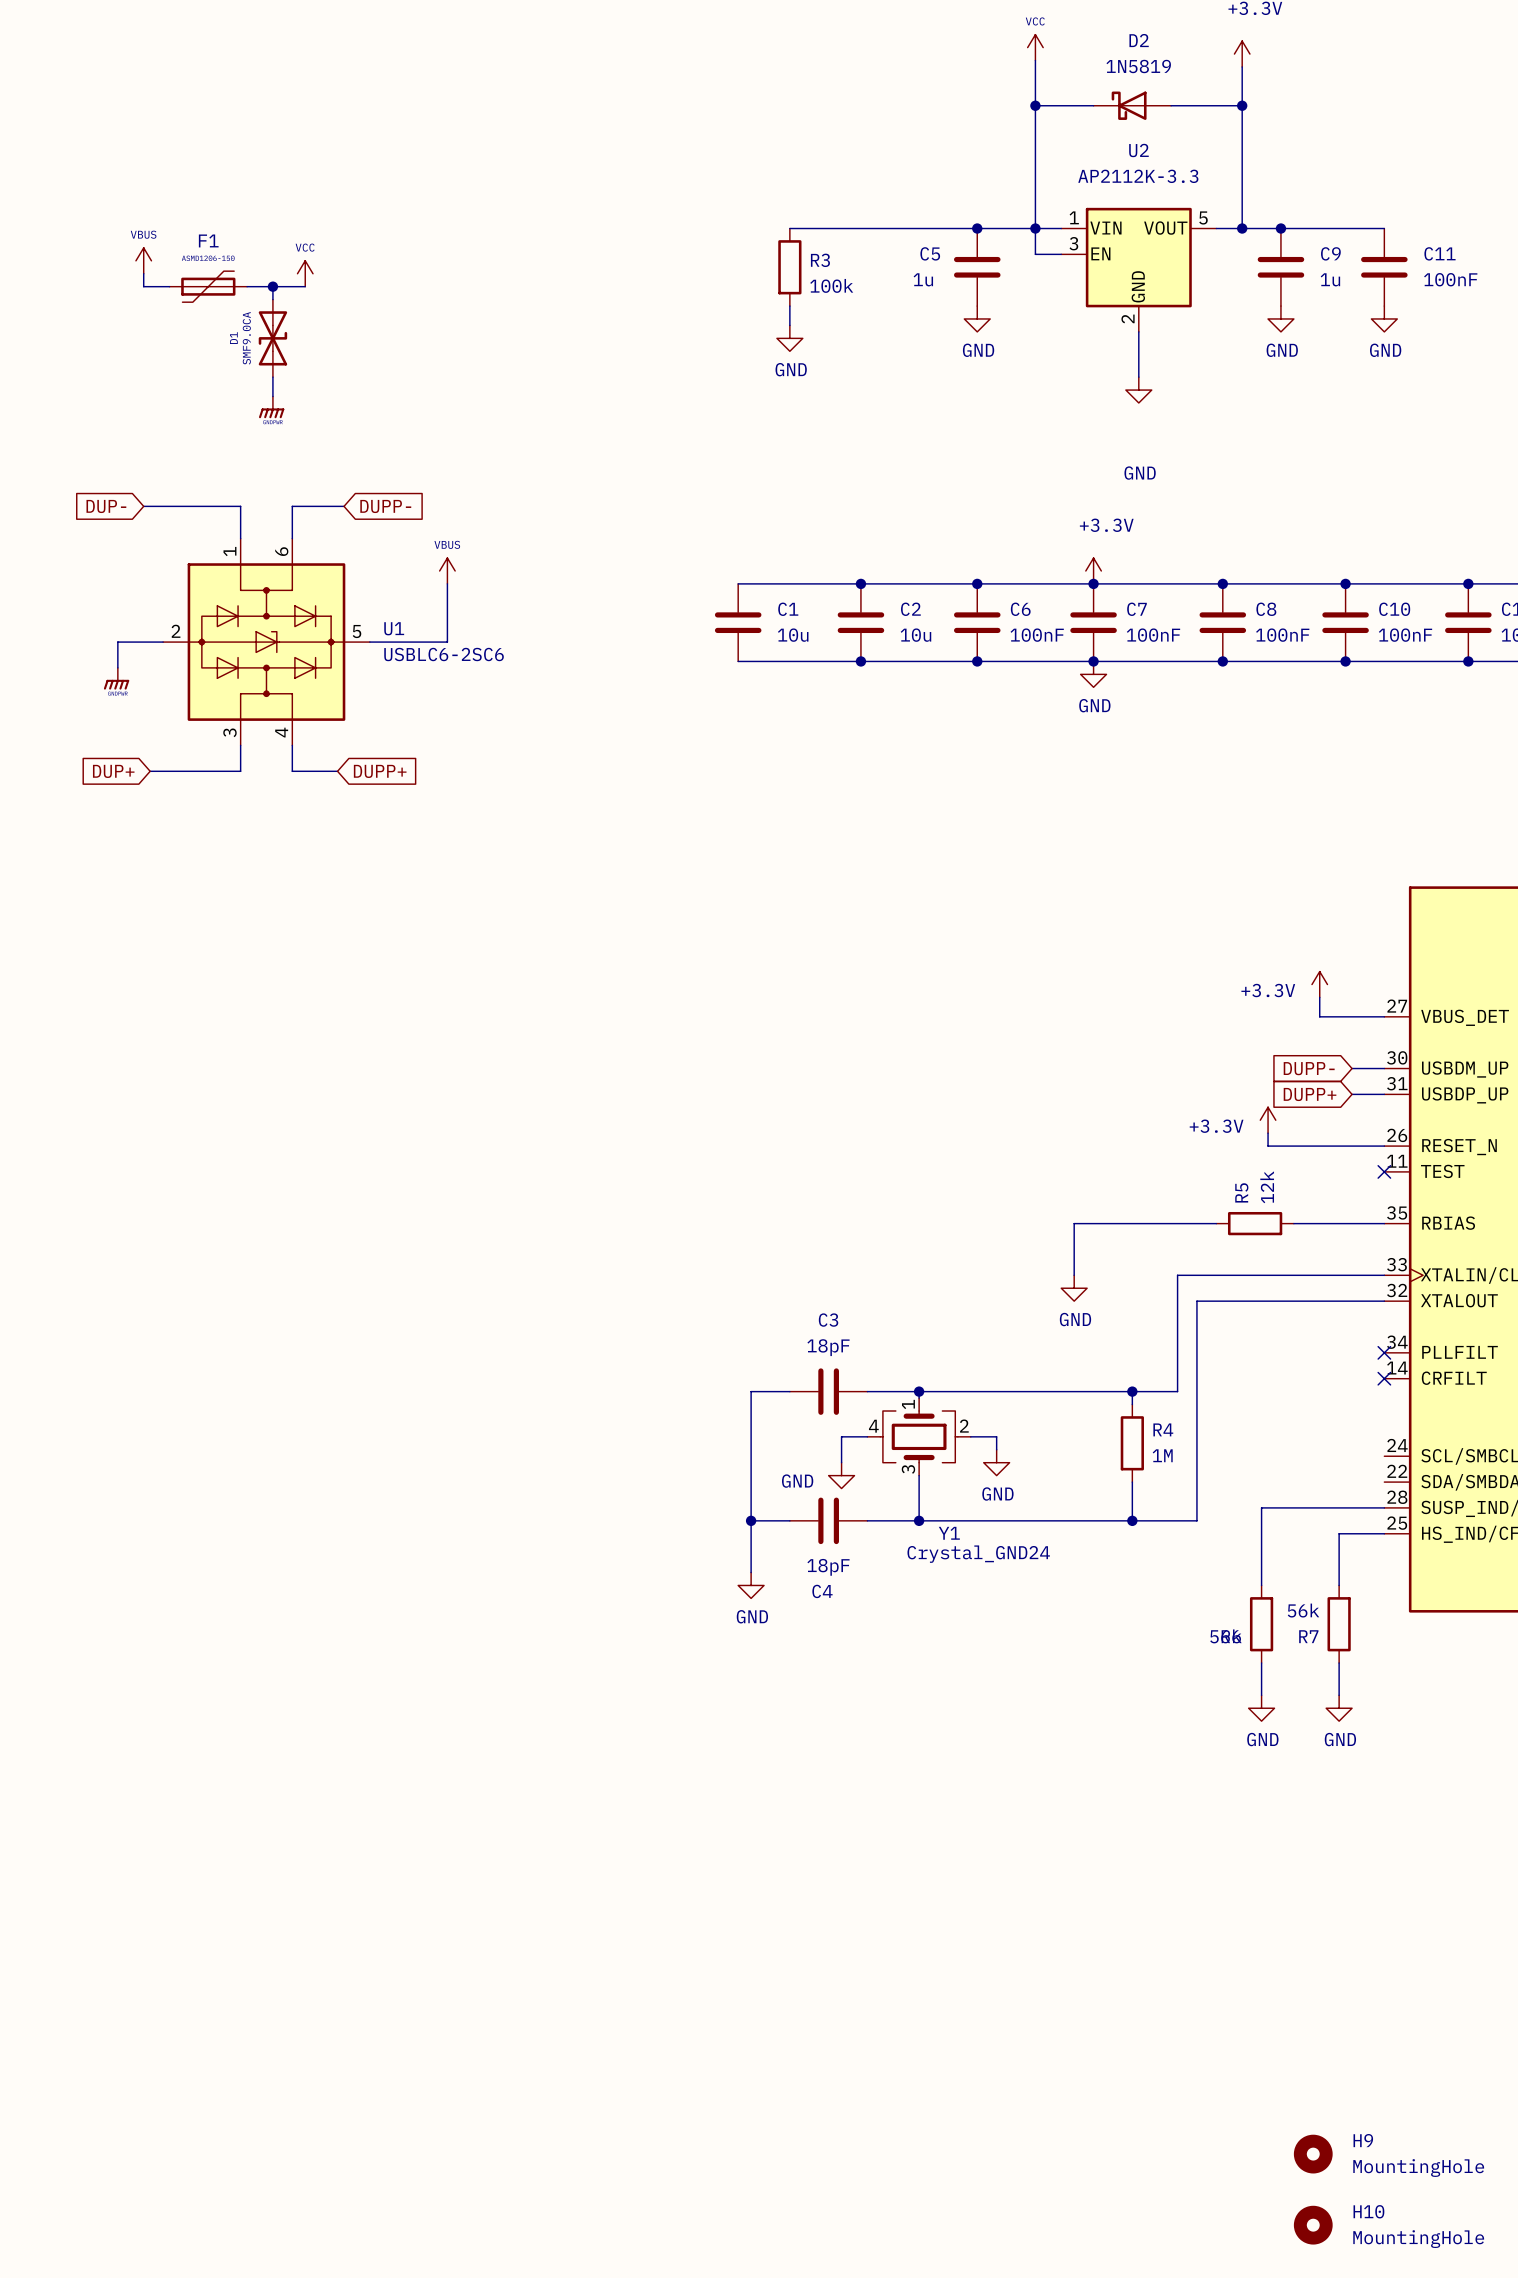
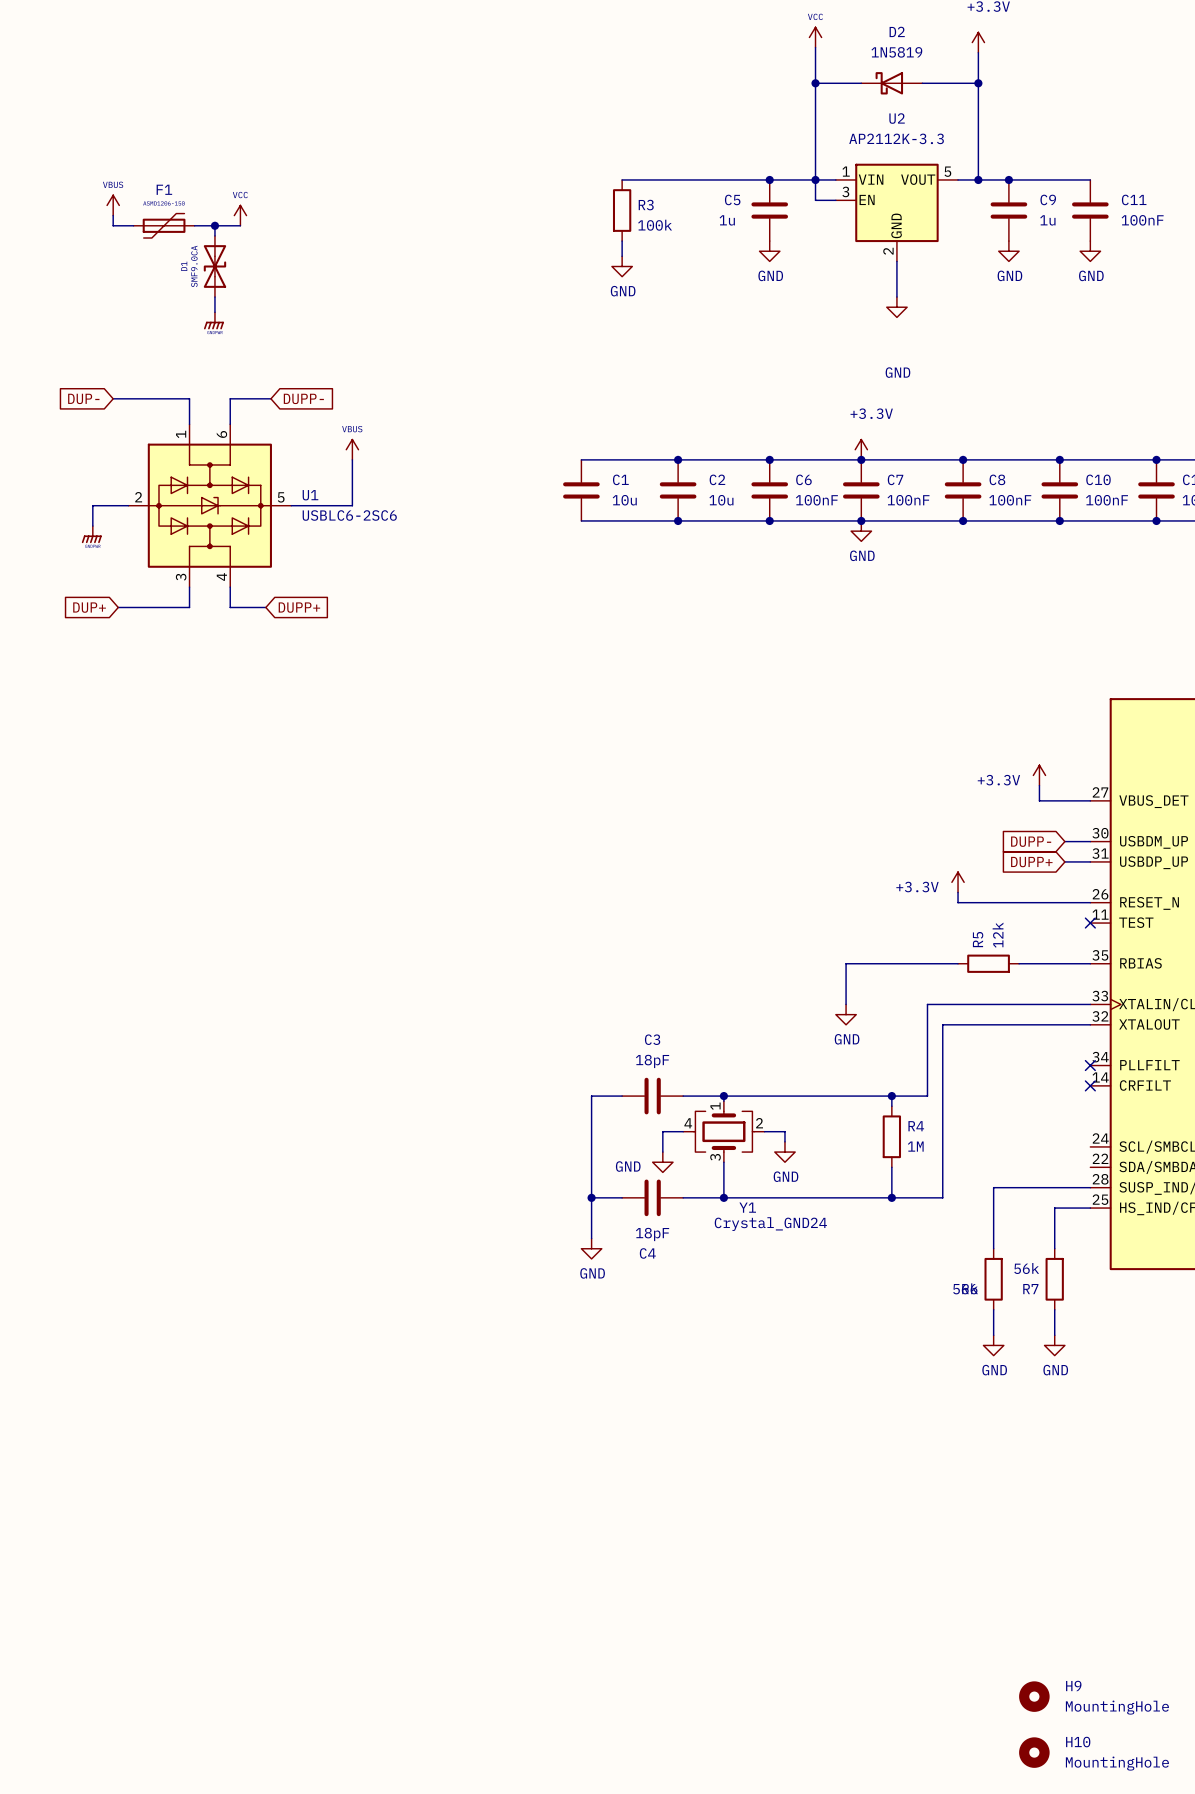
power symbol position: +3.3V (1268, 1120) -> +3.3V (958, 882)
wire: (1268, 1133) (1268, 1146) -> (958, 892) (958, 902) (998, 902)

